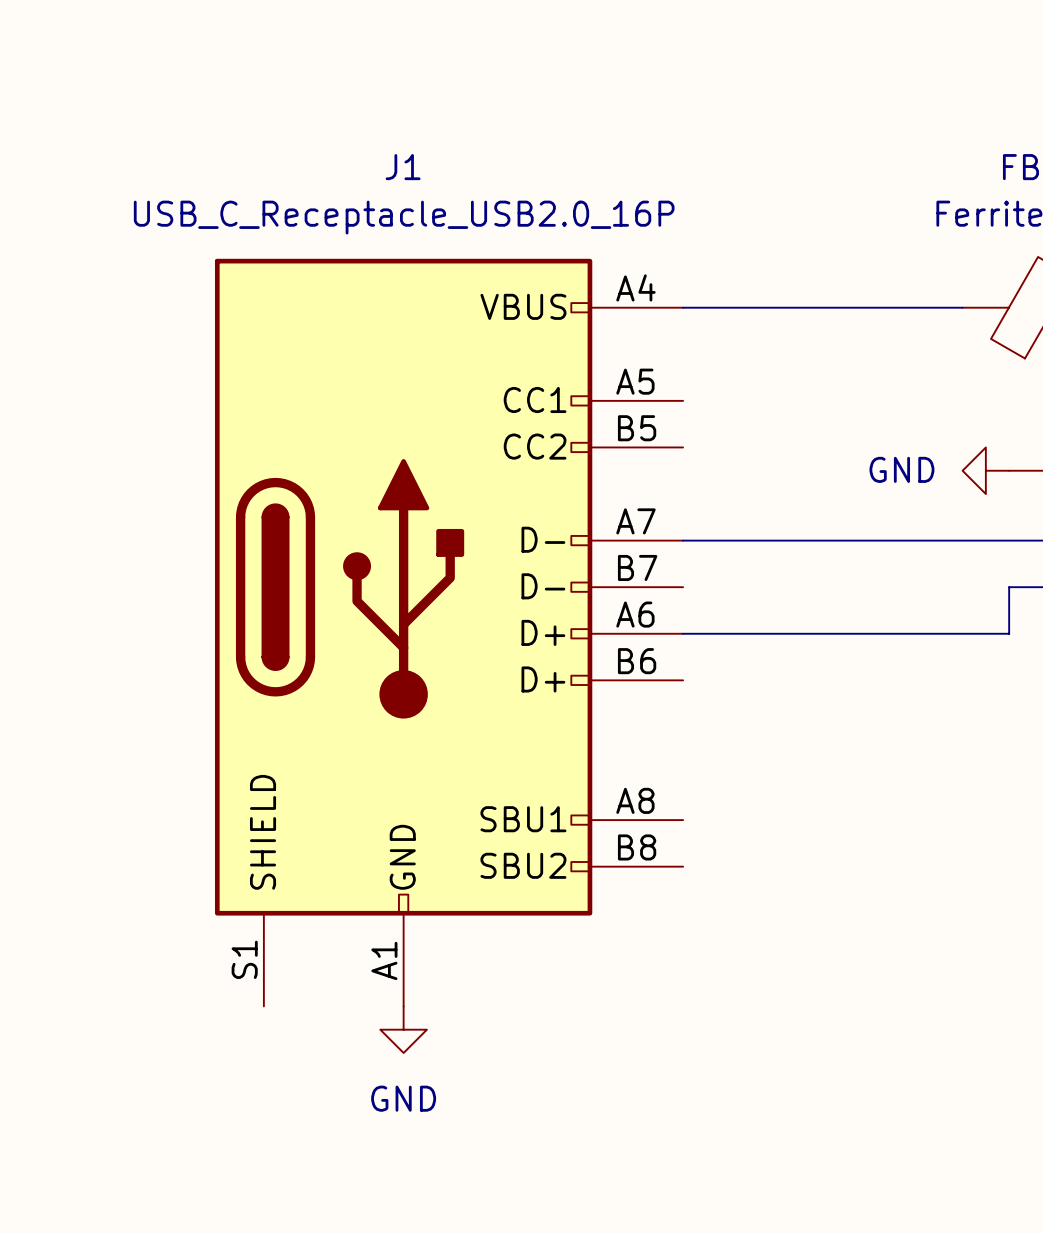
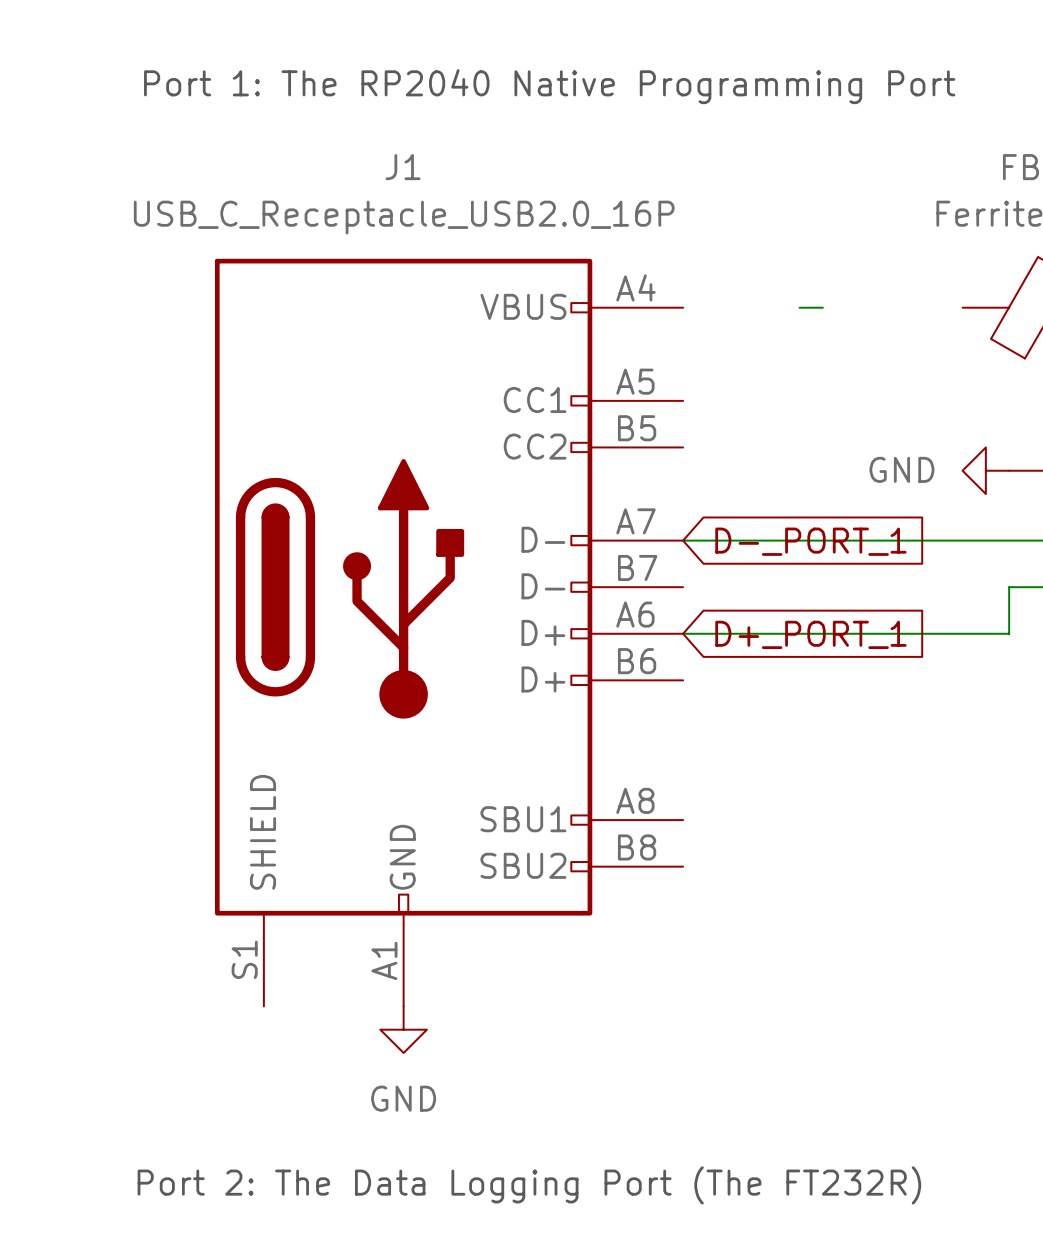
text: none -> Port 1: The RP2040 Native Programming Port (549, 86)
wire: (683, 307) (799, 307) -> none
wire: (822, 307) (962, 307) -> none
global label: none -> D-_PORT_1 (810, 541)
global label: none -> D+_PORT_1 (810, 634)
text: none -> Port 2: The Data Logging Port (The FT232R) (529, 1185)

